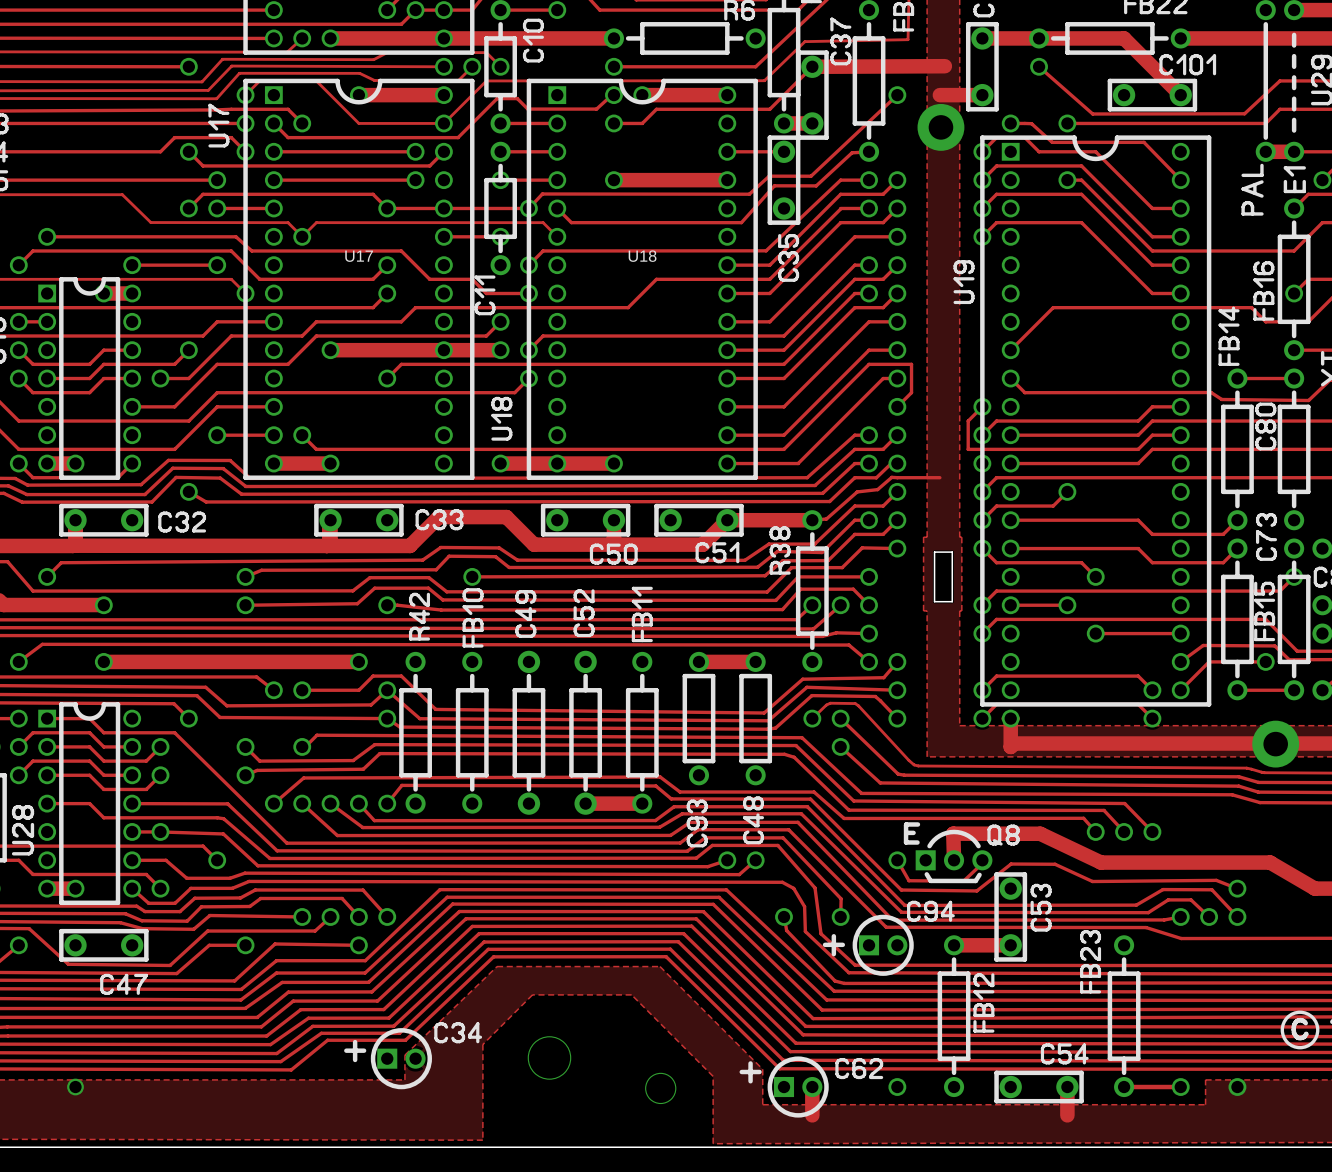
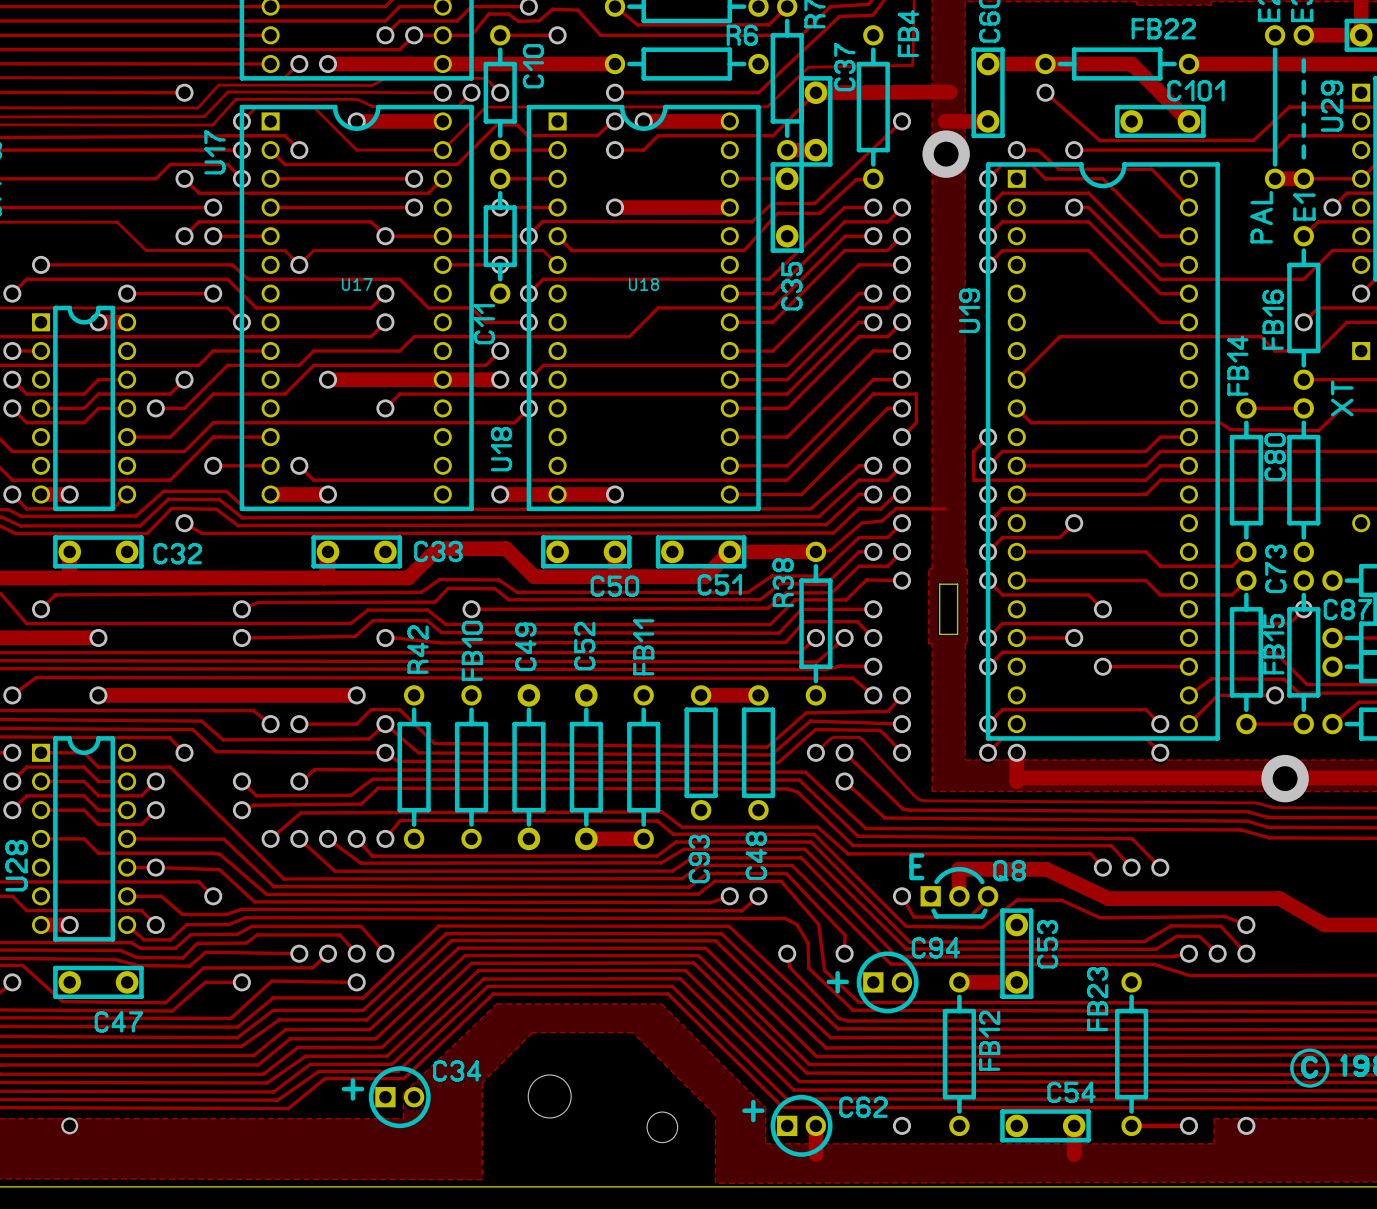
line: (917, 824) (906, 825) (906, 842) (917, 842) -> none
line: (906, 832) (913, 832) -> none
line: (929, 846) (939, 835) (954, 831) (968, 835) (978, 846) -> none
part footprint: [915, 850, 993, 871] -> [920, 866, 999, 919]
line: (926, 874) (930, 880) (975, 880) (979, 874) -> none

